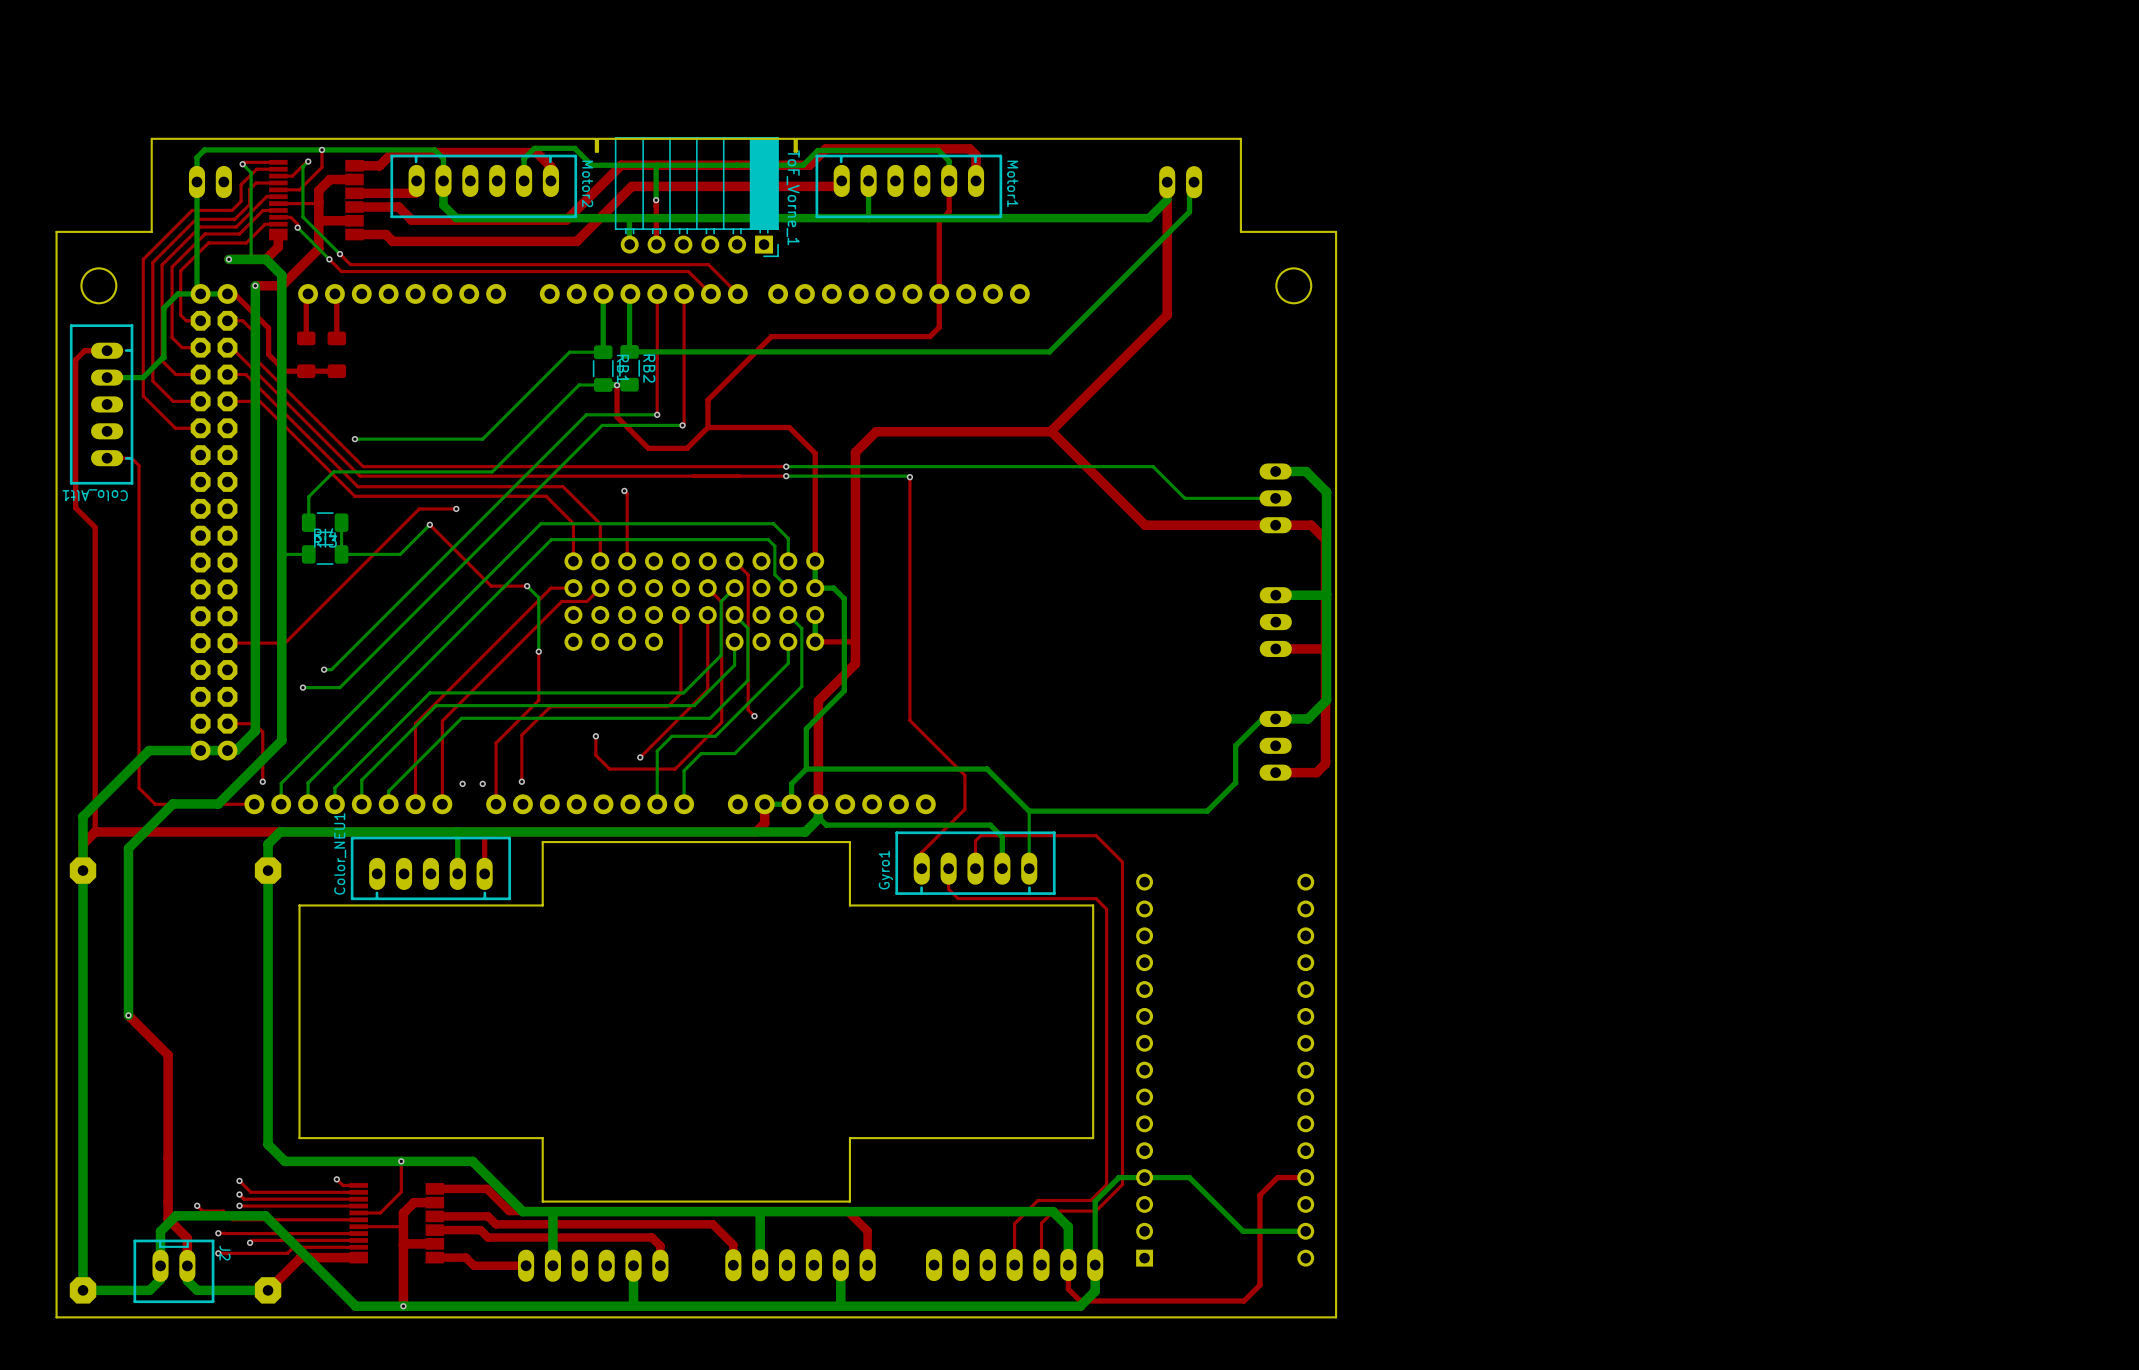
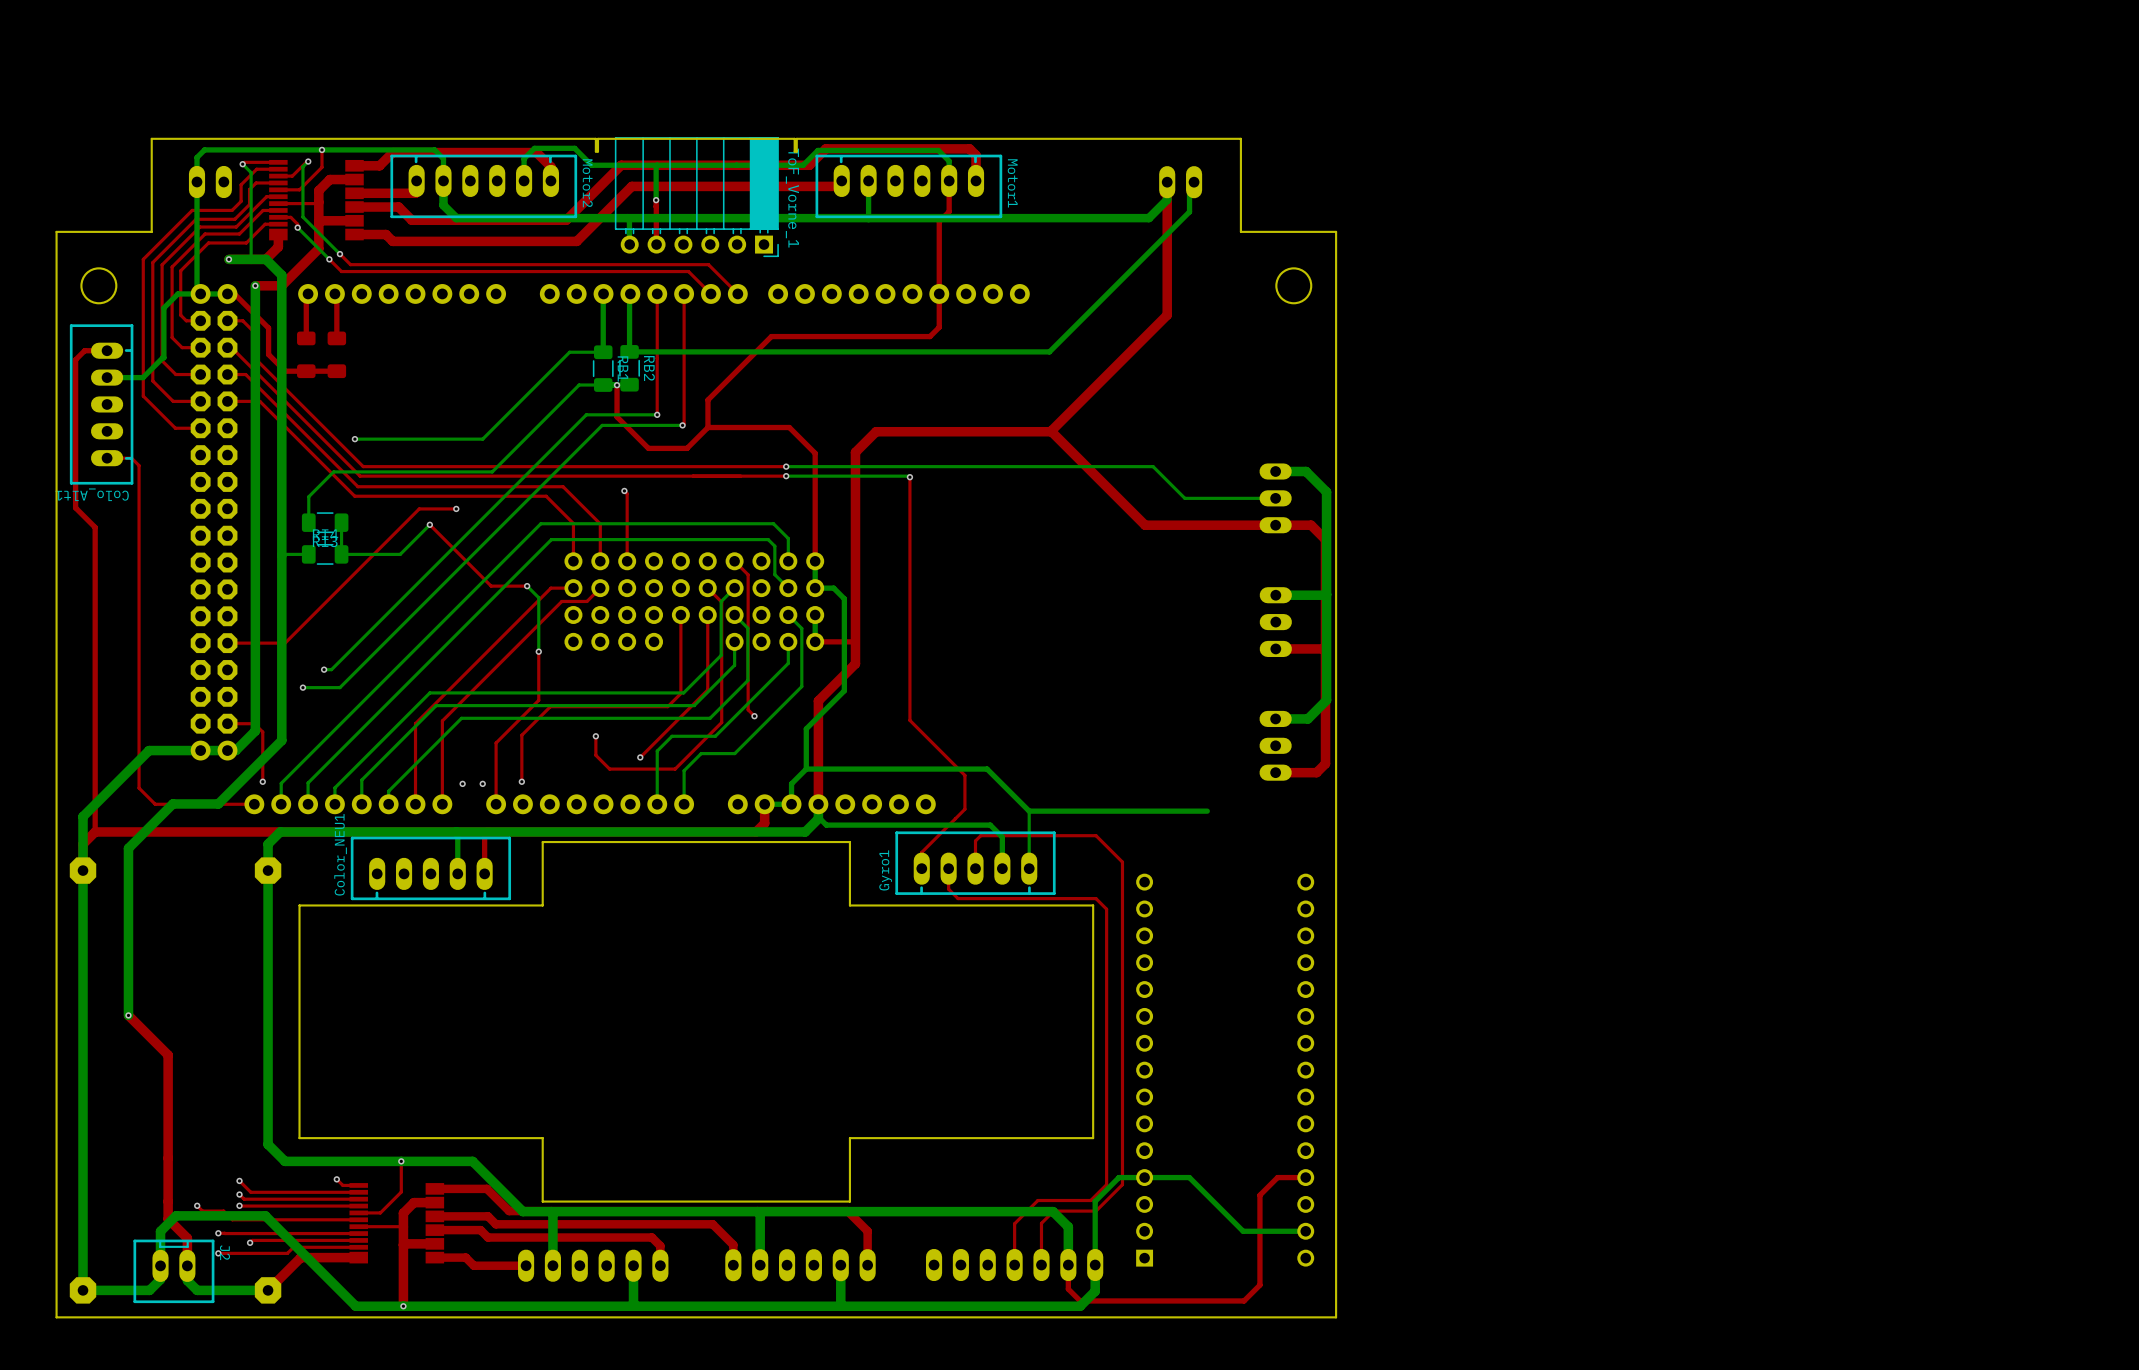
bottom track: (1275, 718) (1262, 718) (1235, 745) (1235, 782) (1207, 811) -> none

